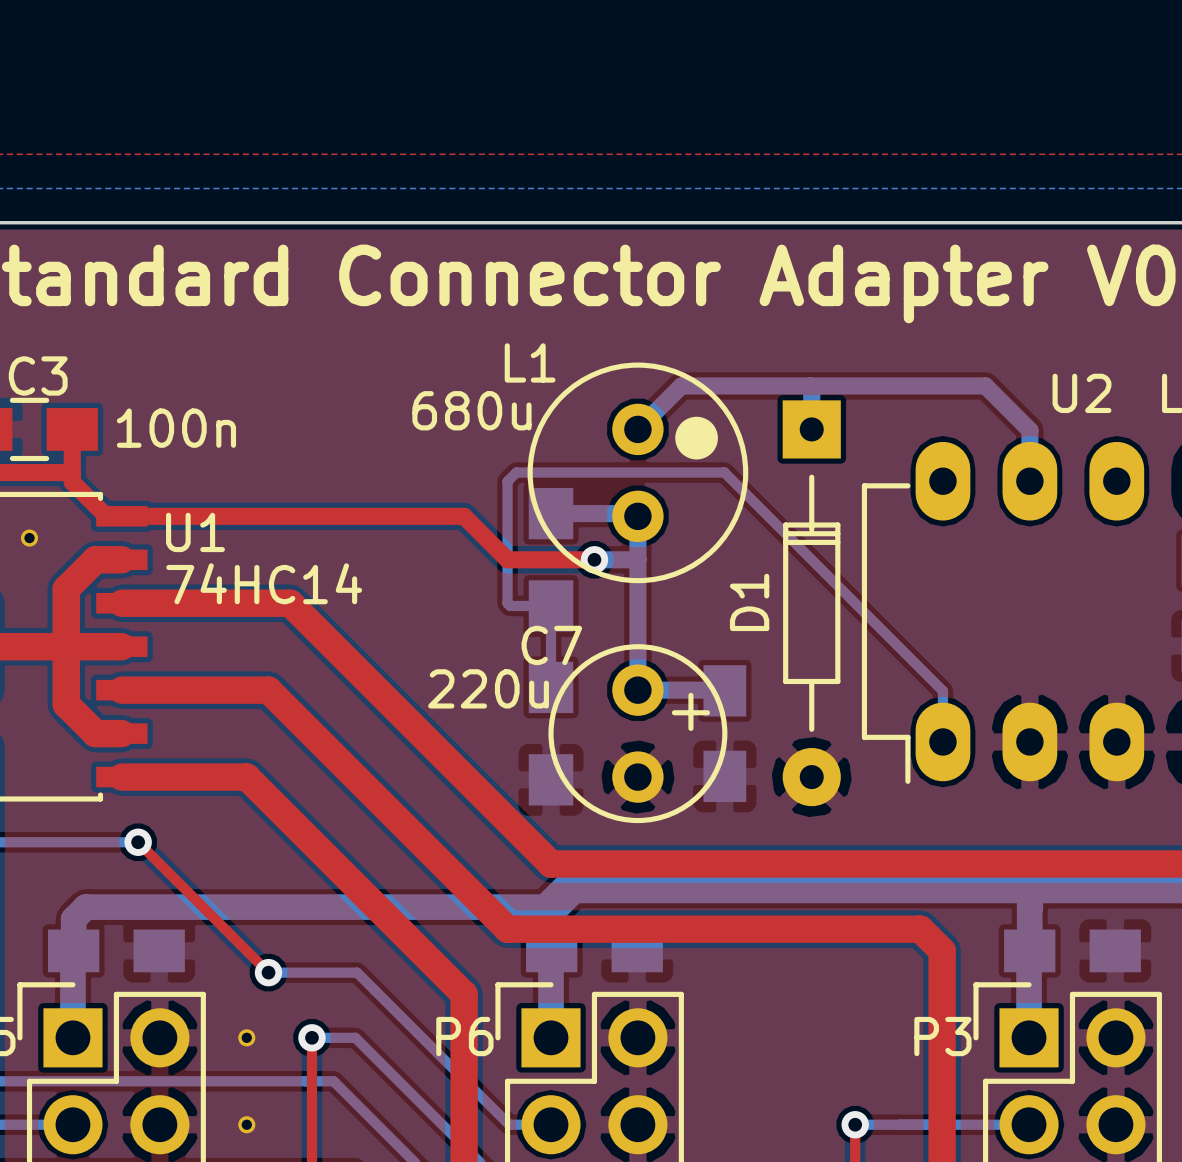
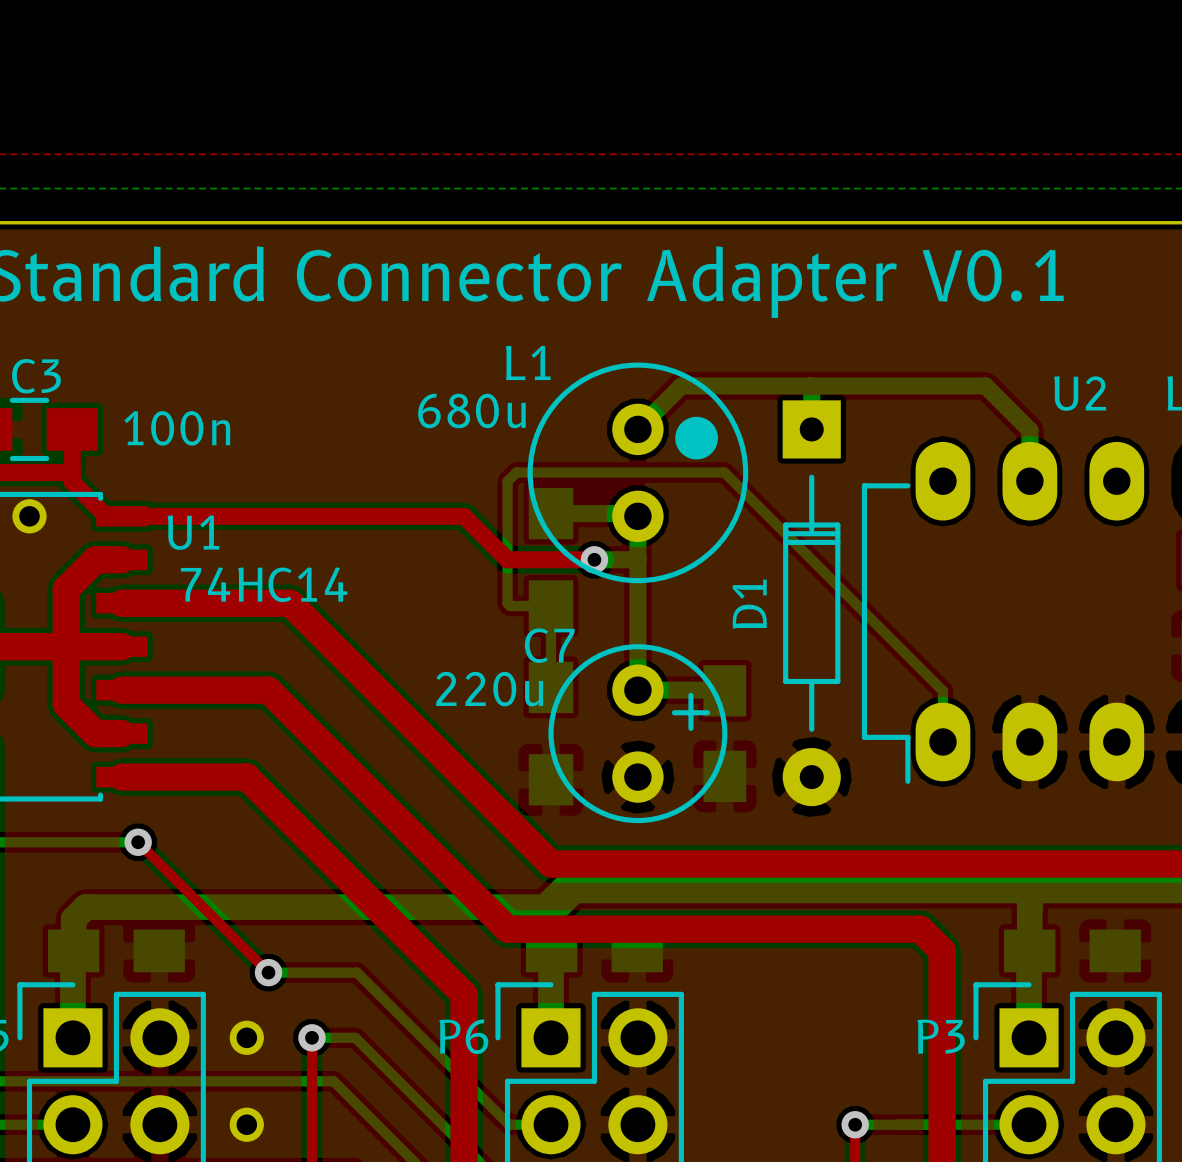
part footprint: [20, 529, 39, 547] -> [12, 499, 47, 534]
part footprint: [238, 1029, 256, 1047] -> [229, 1020, 264, 1055]
part footprint: [238, 1116, 256, 1134] -> [229, 1107, 264, 1142]

